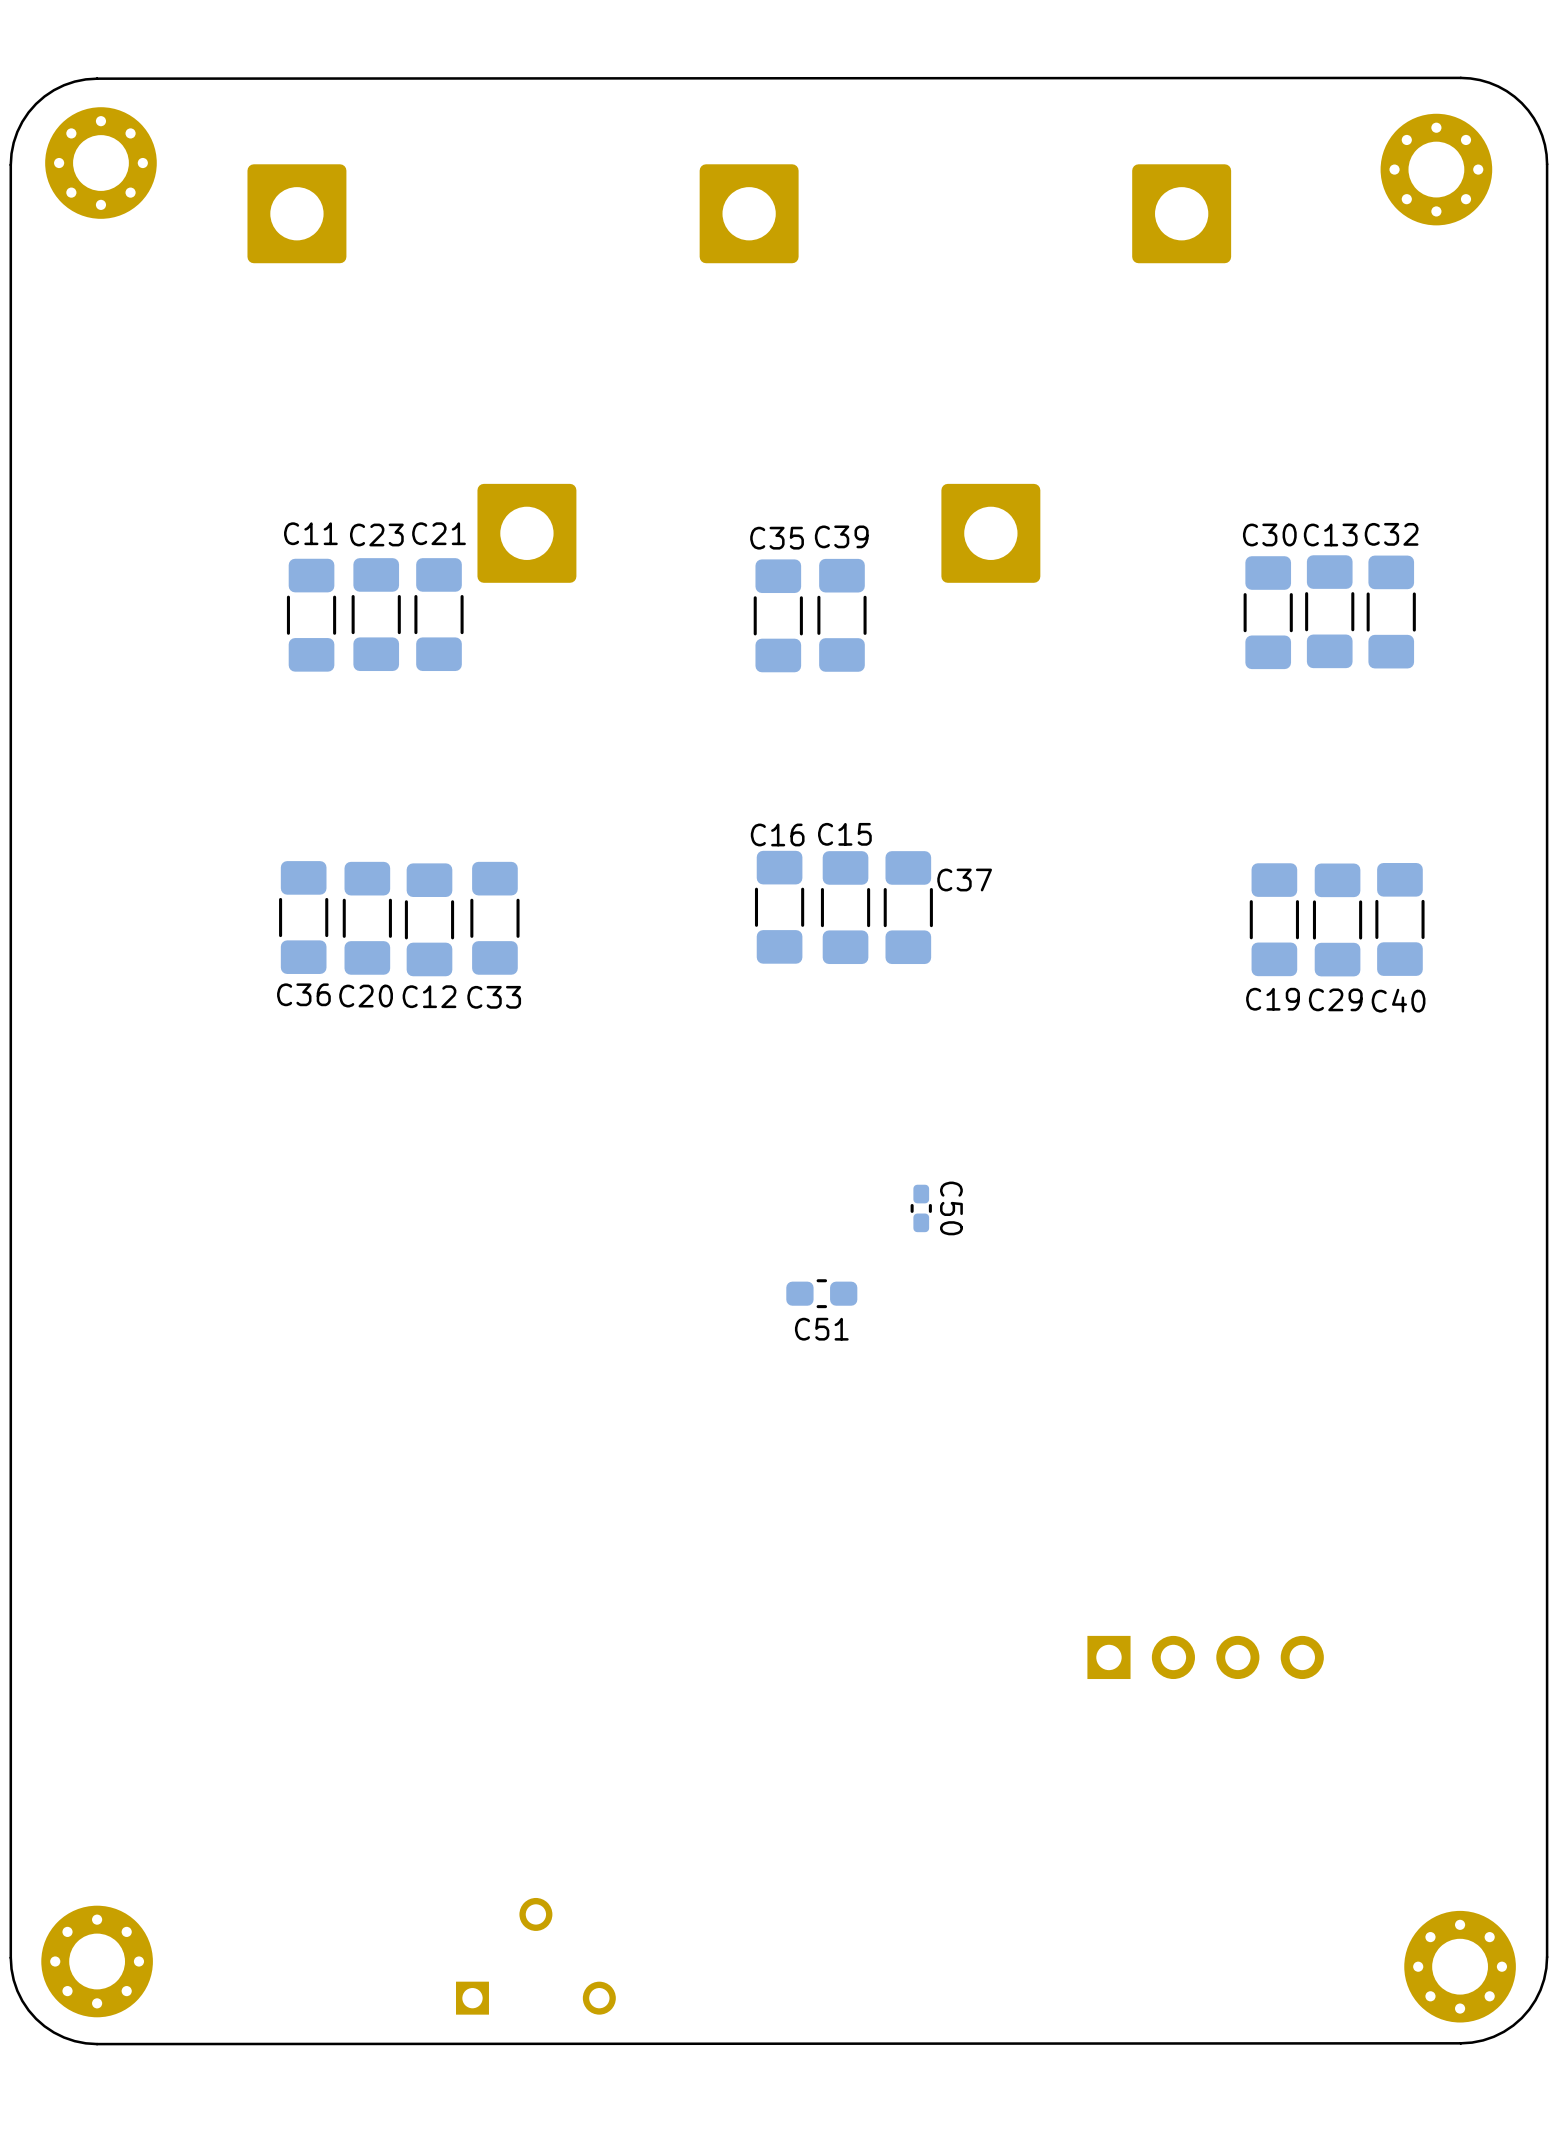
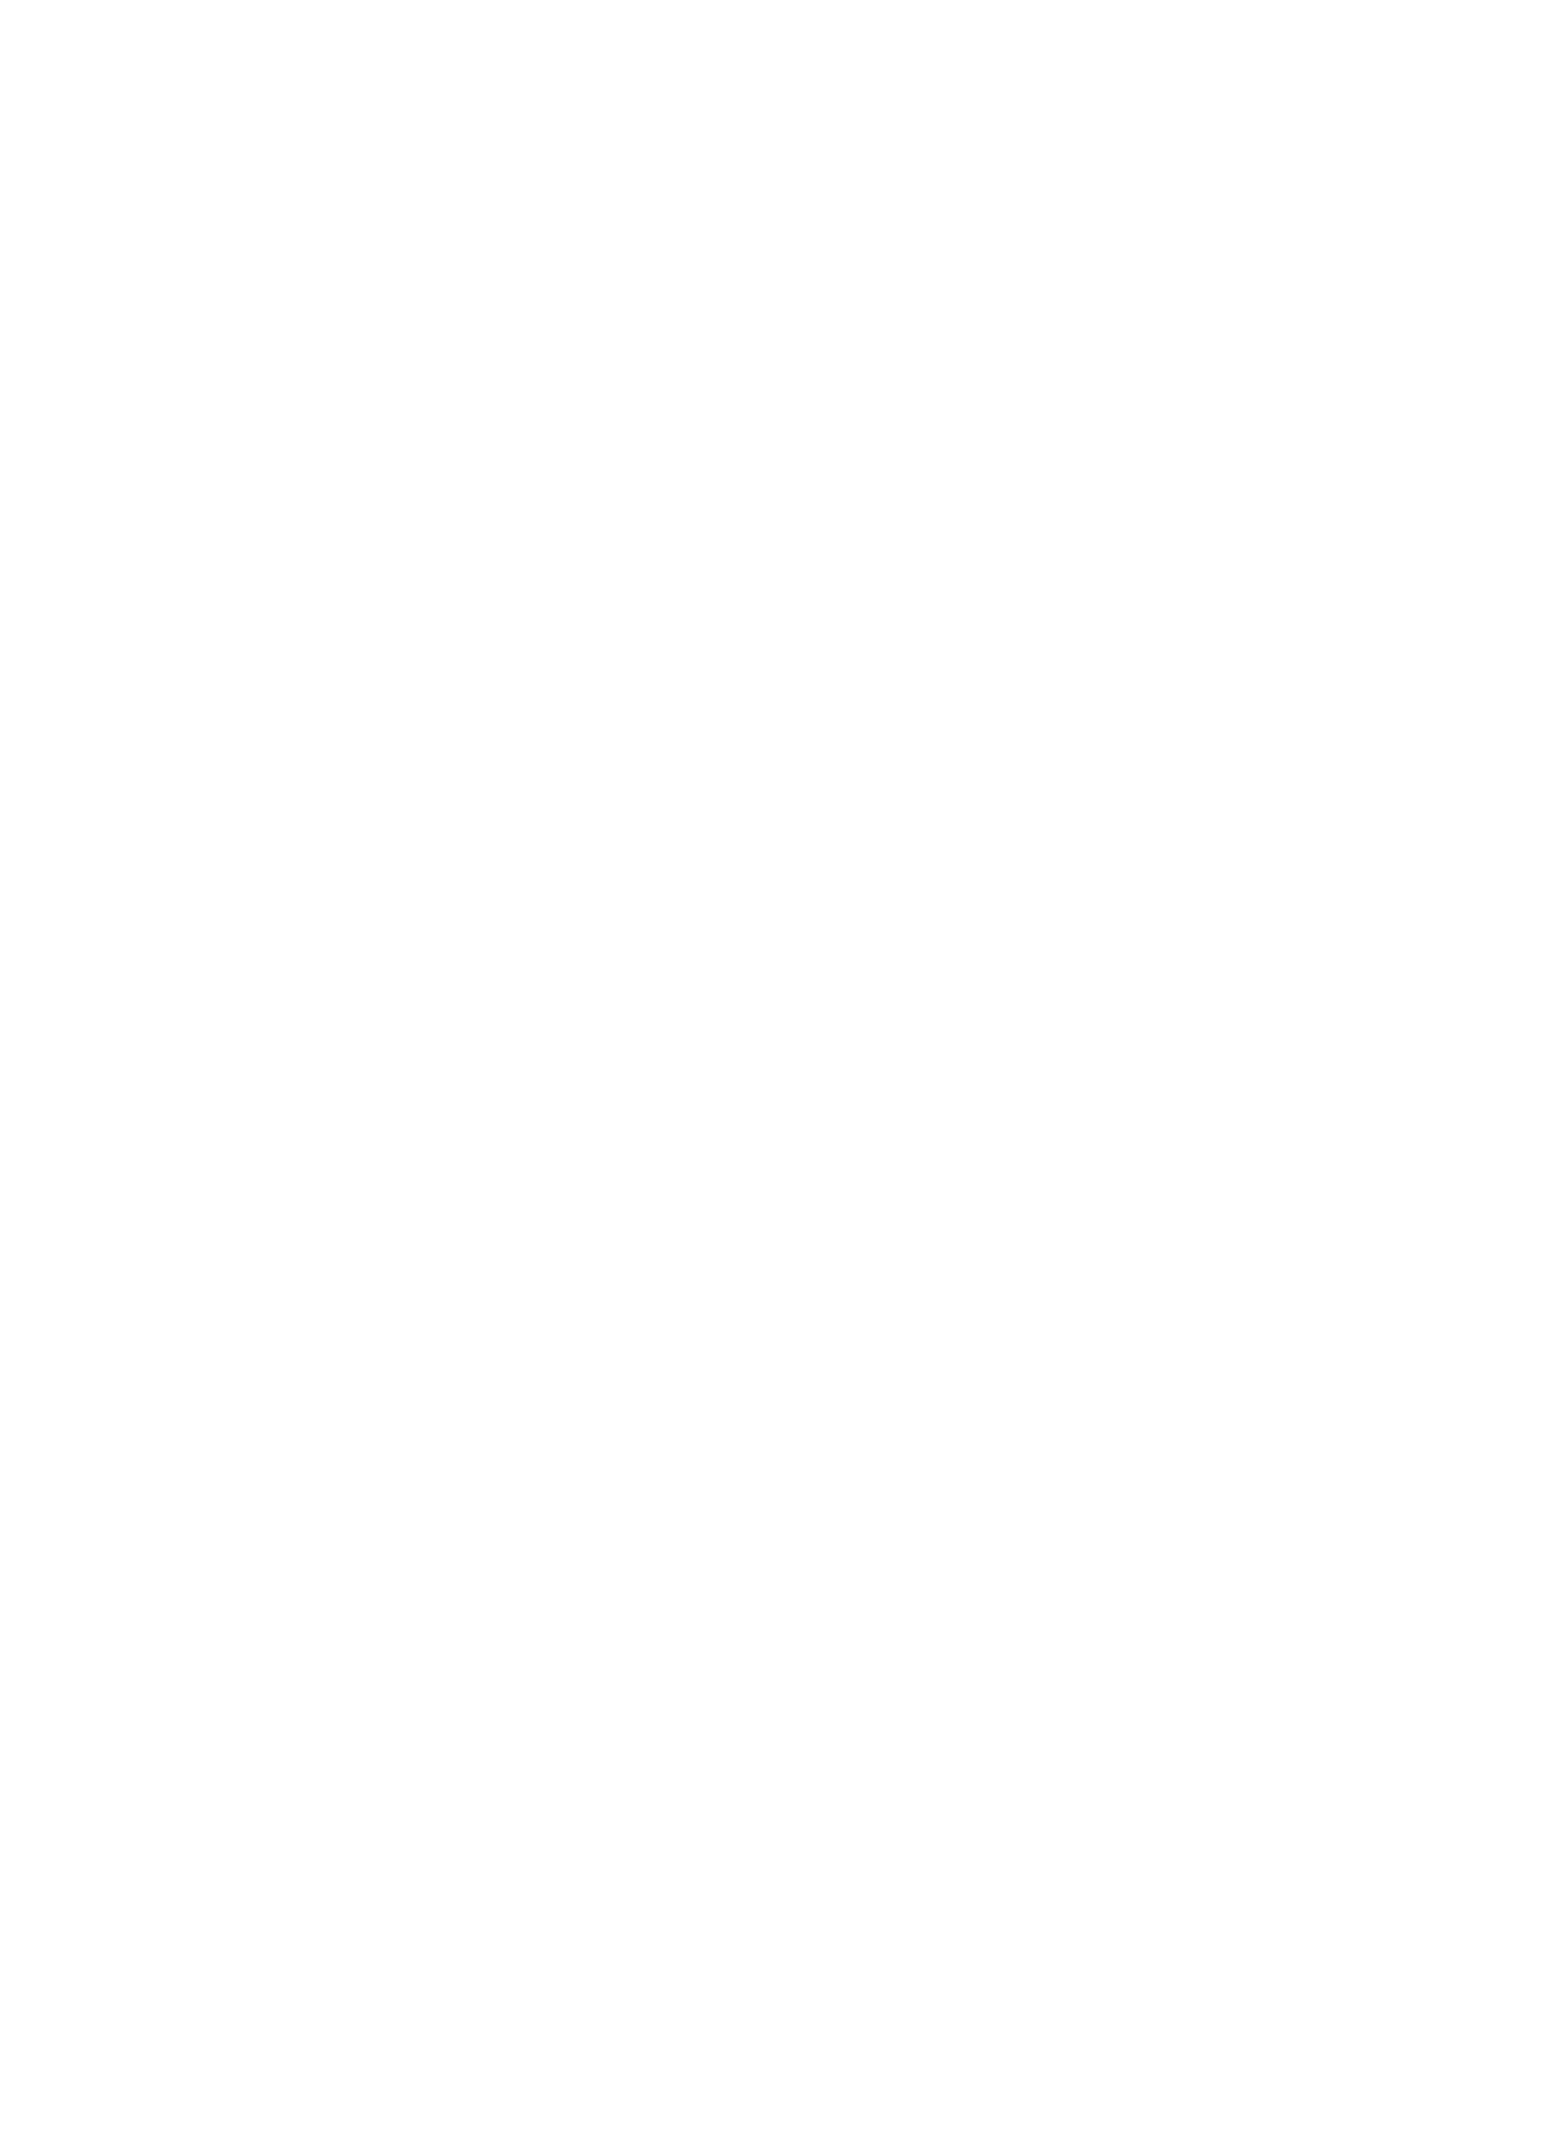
board edge: (1460, 77) (97, 78) (74, 81) (53, 90) (28, 112) (13, 142) (10, 164) (10, 1957) (13, 1980) (22, 2000) (44, 2026) (74, 2041) (97, 2044) (1460, 2043) (1493, 2036) (1513, 2025) (1529, 2009) (1540, 1990) (1547, 1957) (1547, 164) (1542, 135) (1533, 118) (1521, 103) (1506, 91) (1489, 82) (1460, 77) -> none
part: (100, 163) -> none
part: (1436, 169) -> none
part: (296, 213) -> none
part: (749, 213) -> none
part: (1181, 213) -> none
part: (526, 533) -> none
part: (990, 533) -> none
C13: (1329, 611) -> none
C30: (1268, 612) -> none
C32: (1391, 612) -> none
C23: (376, 614) -> none
C21: (439, 614) -> none
C11: (311, 615) -> none
C35: (778, 615) -> none
C39: (841, 615) -> none
C16: (779, 907) -> none
C15: (845, 907) -> none
C37: (908, 907) -> none
C36: (303, 917) -> none
C20: (367, 918) -> none
C33: (494, 918) -> none
C12: (429, 919) -> none
C19: (1274, 919) -> none
C29: (1337, 919) -> none
C40: (1399, 919) -> none
C50: (921, 1208) -> none
C51: (821, 1293) -> none
part: (1205, 1657) -> none
part: (535, 1956) -> none
part: (97, 1961) -> none
part: (1460, 1966) -> none

